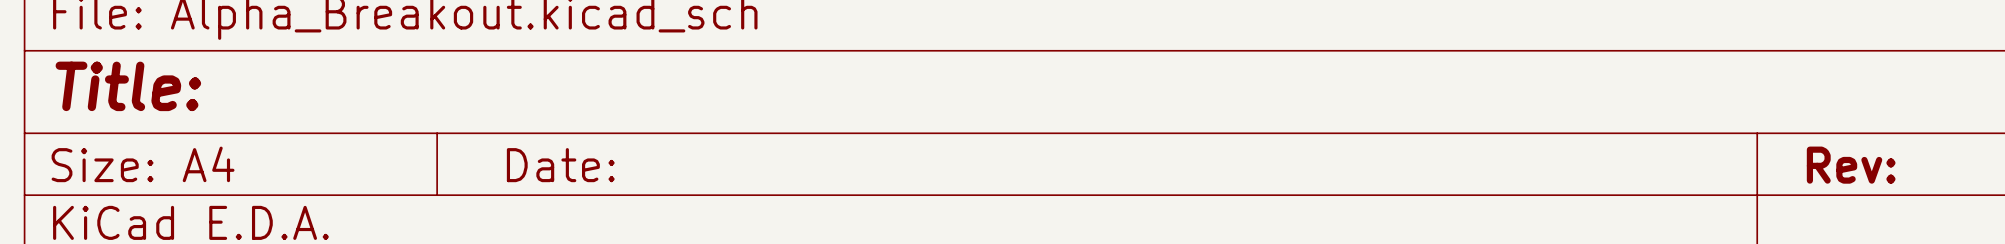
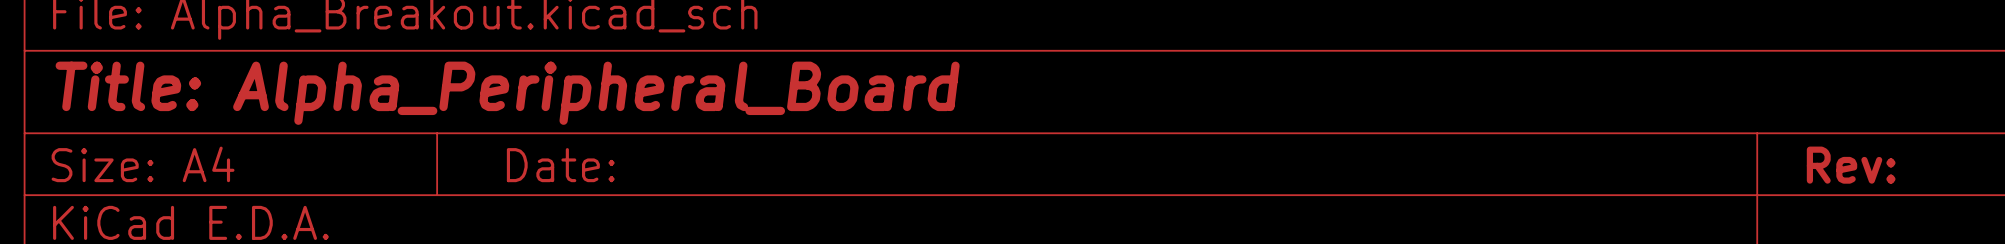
title block: Title: (128, 86) -> Title: Alpha_Peripheral_Board (507, 93)

